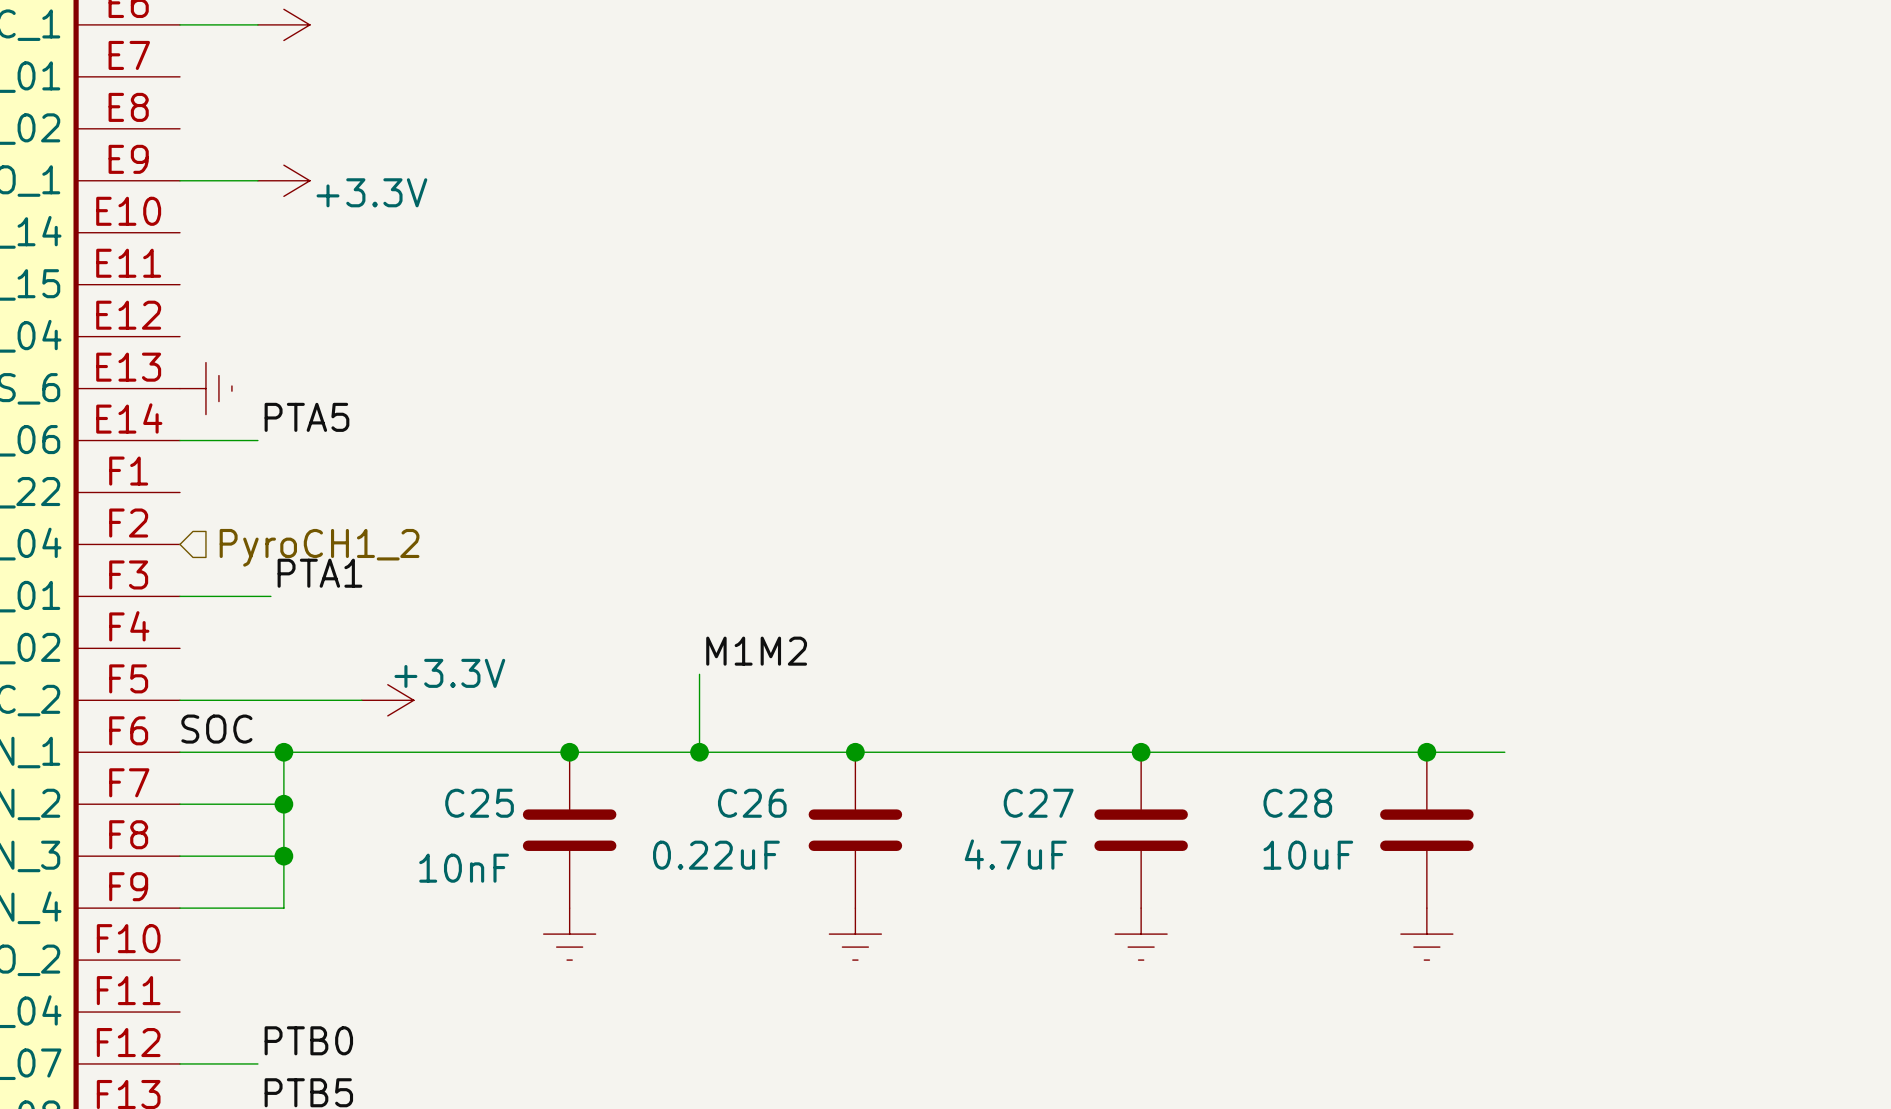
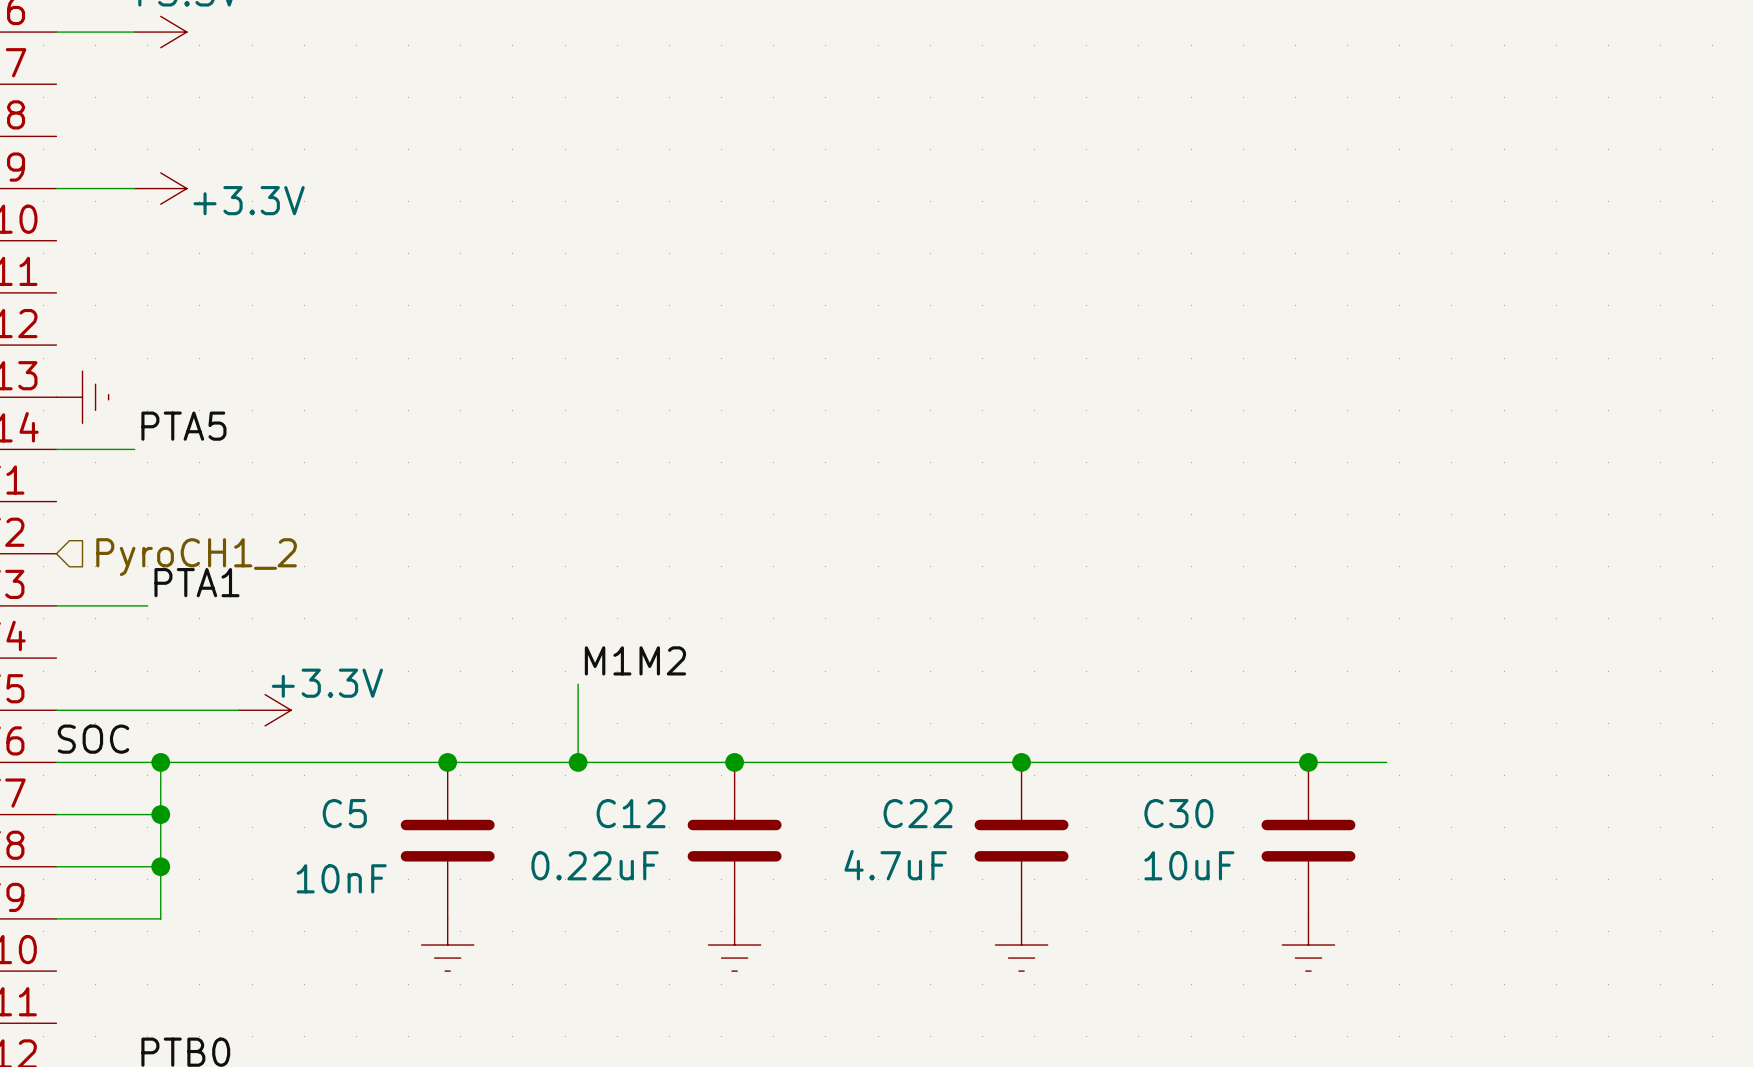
C25 name: C25 (479, 803) -> C5 (344, 813)
C26 name: C26 (752, 803) -> C12 (631, 813)
C27 name: C27 (1038, 803) -> C22 (918, 813)
C28 name: C28 (1297, 803) -> C30 (1178, 813)

